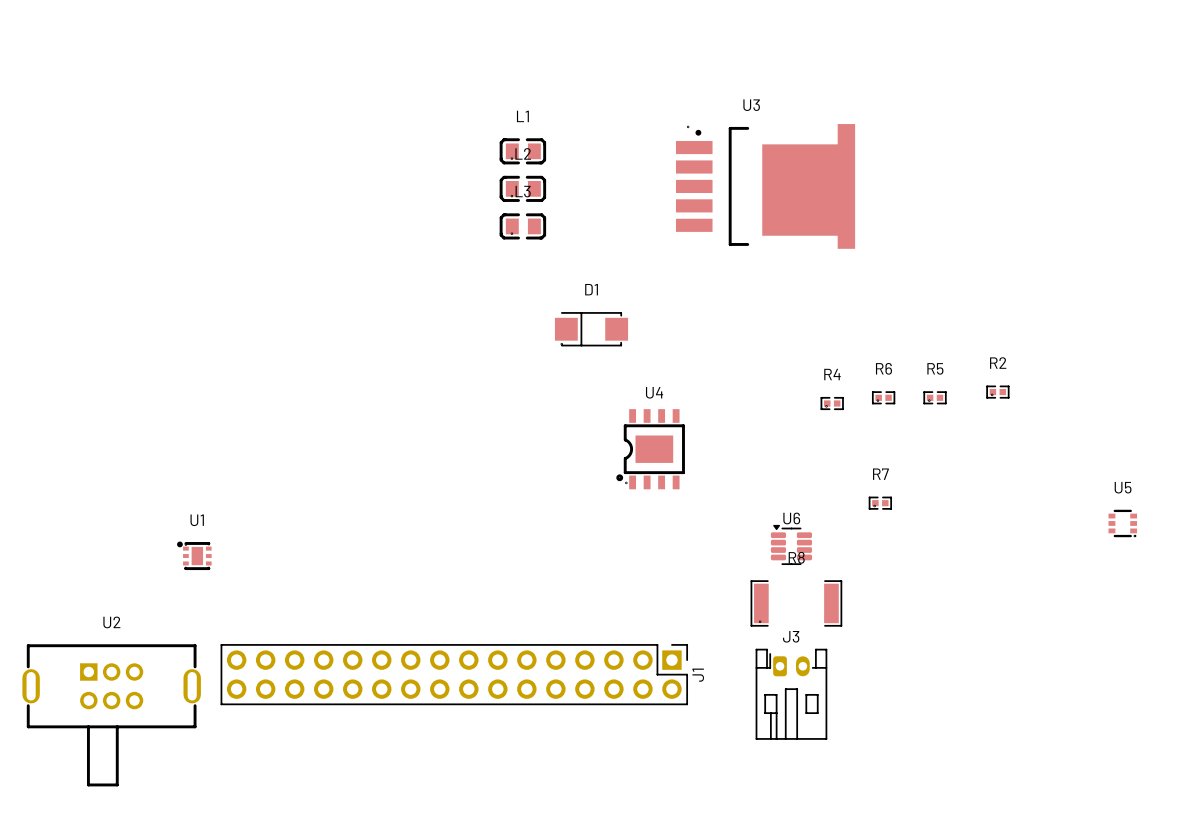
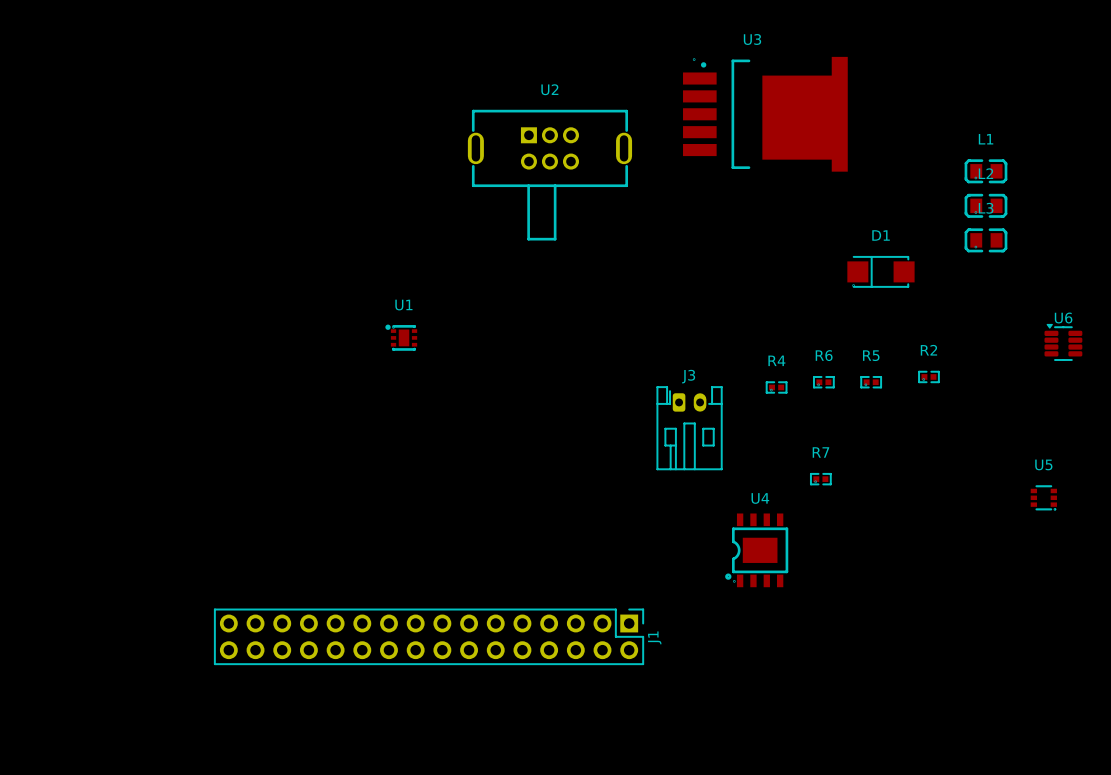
L1 position: (522, 151) -> (985, 171)
U3 position: (765, 186) -> (765, 114)
L2 position: (522, 188) -> (985, 205)
L3 position: (522, 226) -> (985, 240)
D1 position: (591, 329) -> (880, 271)
U4 position: (650, 449) -> (756, 550)
U6 position: (791, 544) -> (1063, 342)
U1 position: (194, 555) -> (401, 337)
R8: (796, 603) -> none
J3 position: (791, 694) -> (689, 428)
U2 position: (111, 715) -> (549, 175)

